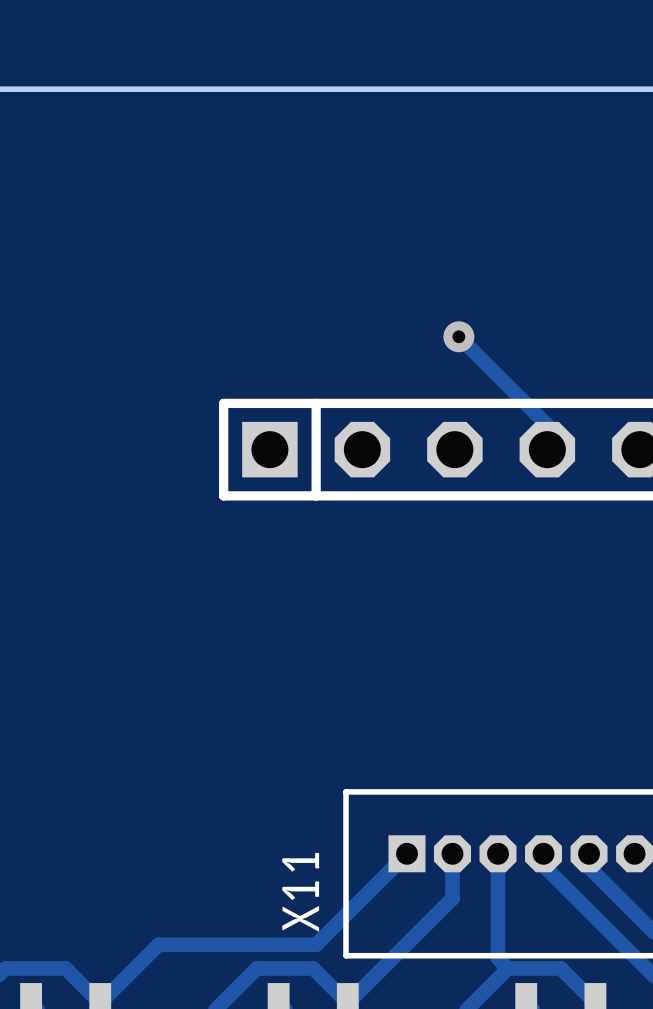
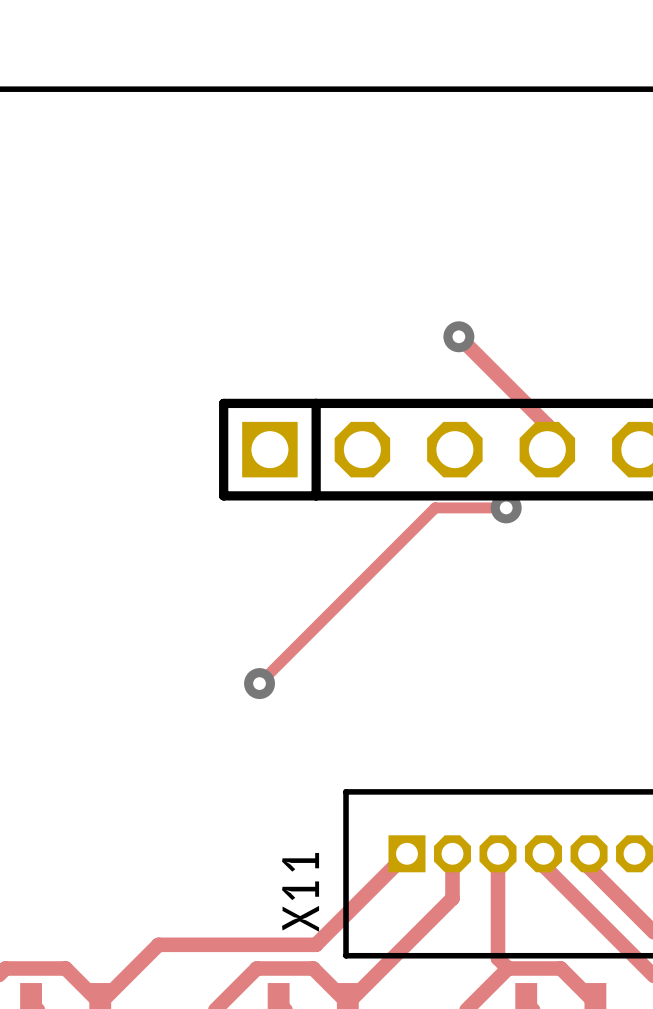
track: none -> (506, 507) (435, 507) (259, 683)
via: none -> (506, 507)
via: none -> (259, 683)

